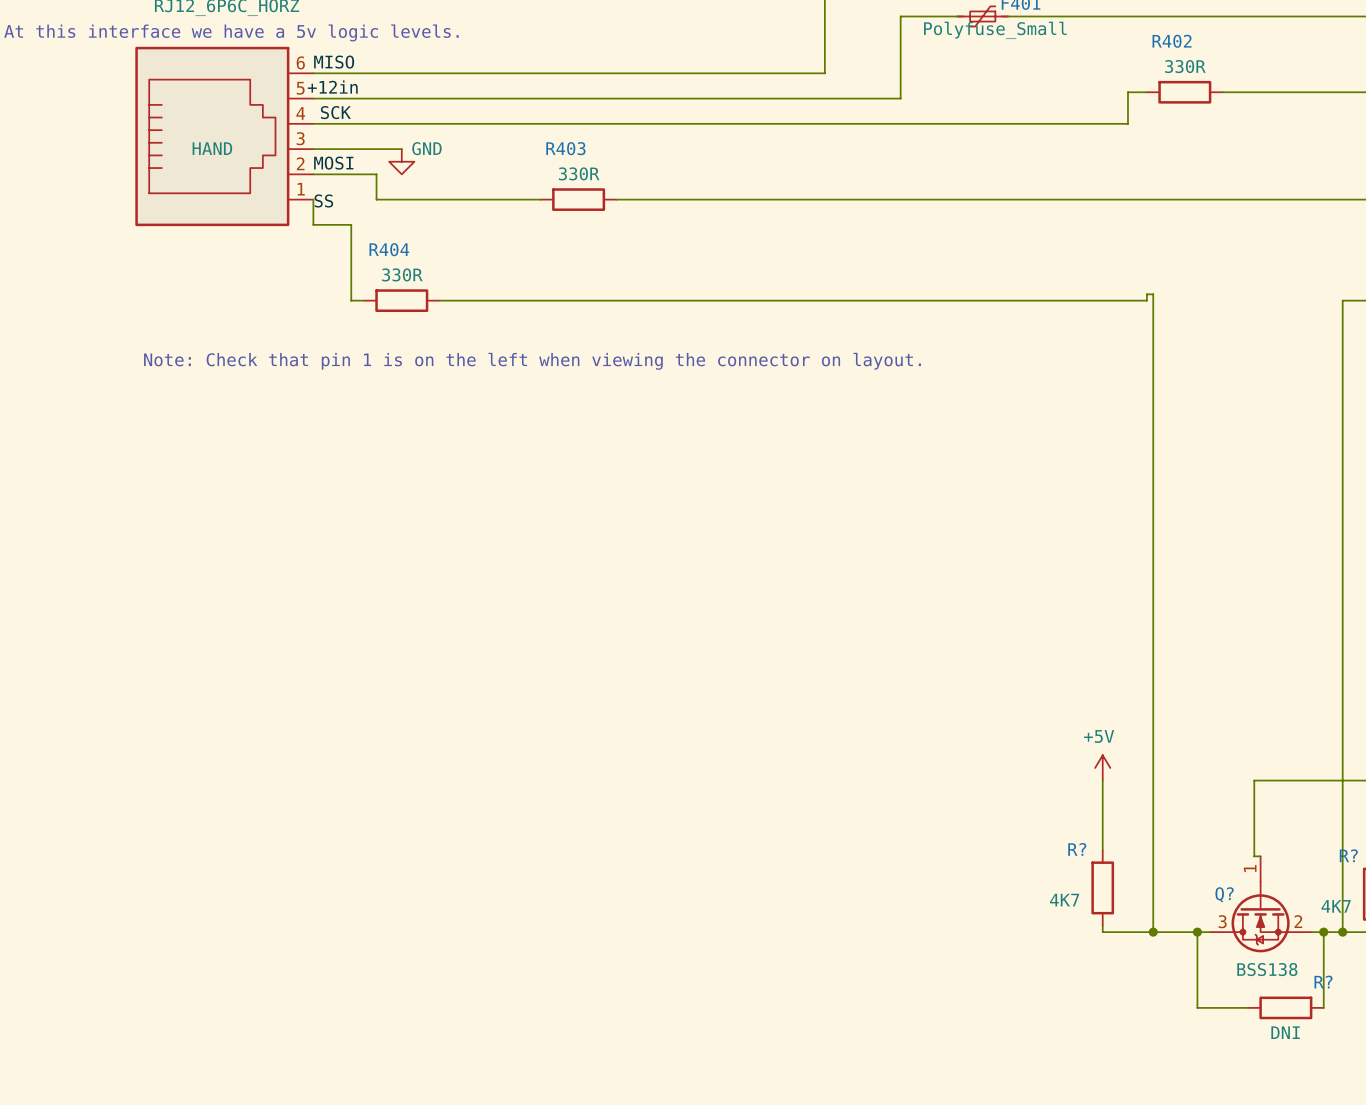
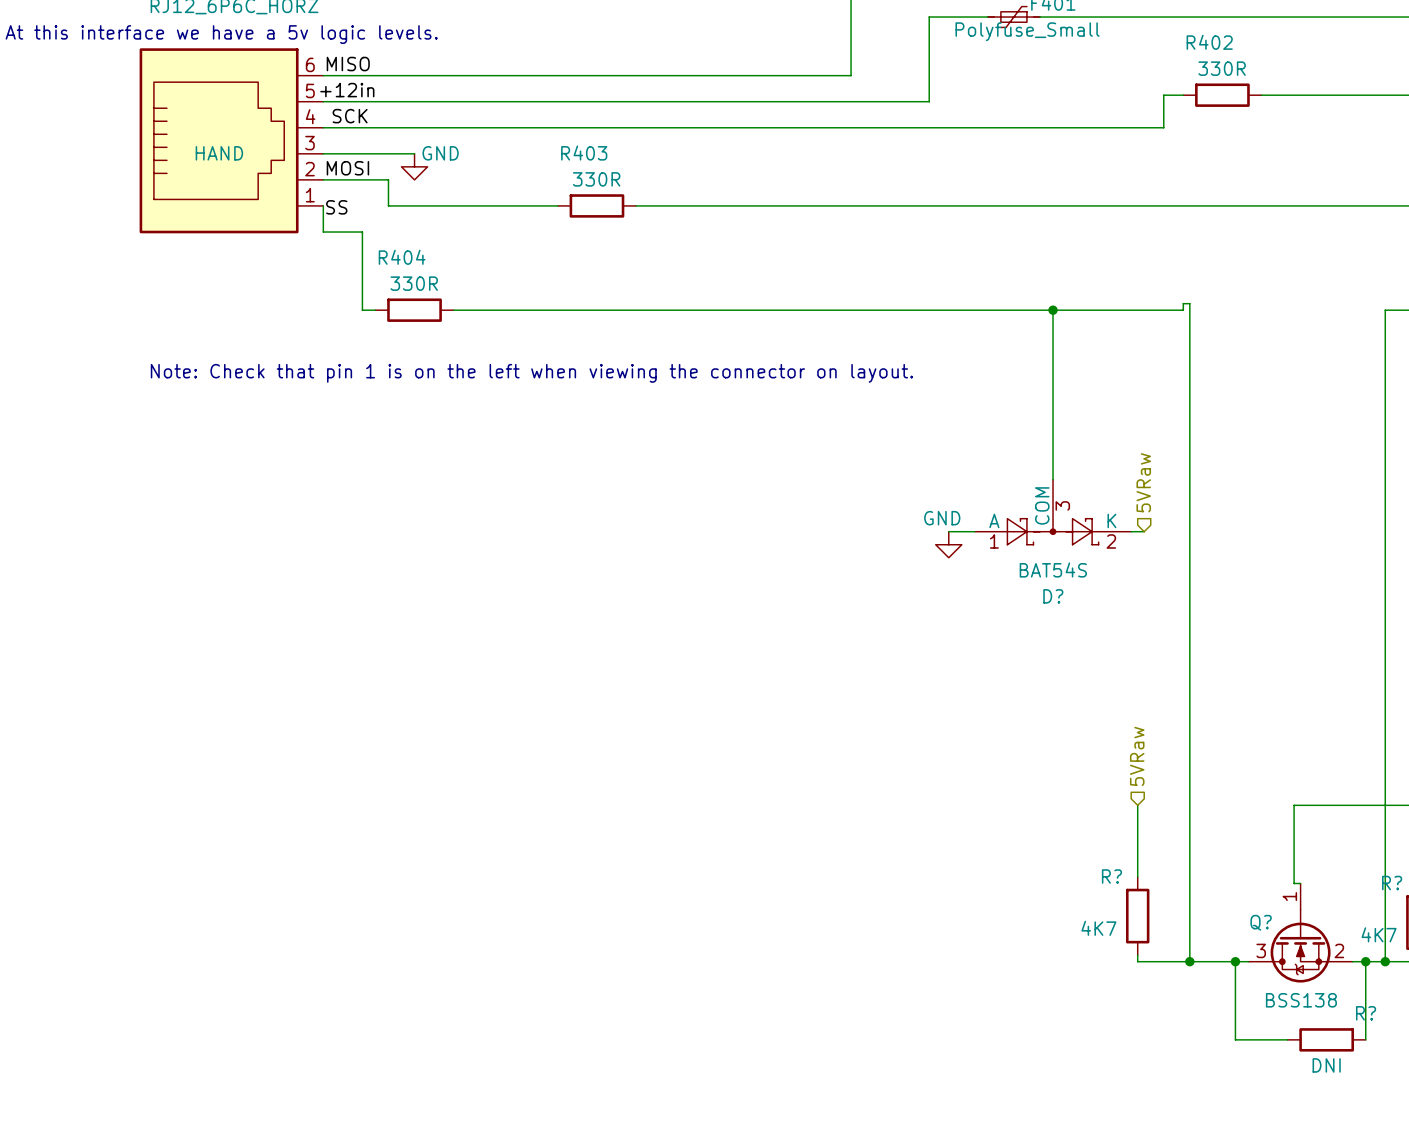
wire: none -> (1053, 310) (1053, 479)
junction: none -> (1053, 310)
hierarchical label: none -> 5VRaw (1143, 482)
D?: none -> BAT54S (1053, 512)
wire: none -> (948, 531) (974, 531)
wire: none -> (1131, 531) (1144, 531)
power symbol: none -> GND (948, 544)
hierarchical label: none -> 5VRaw (1137, 756)
power symbol: +5V (1102, 767) -> none

